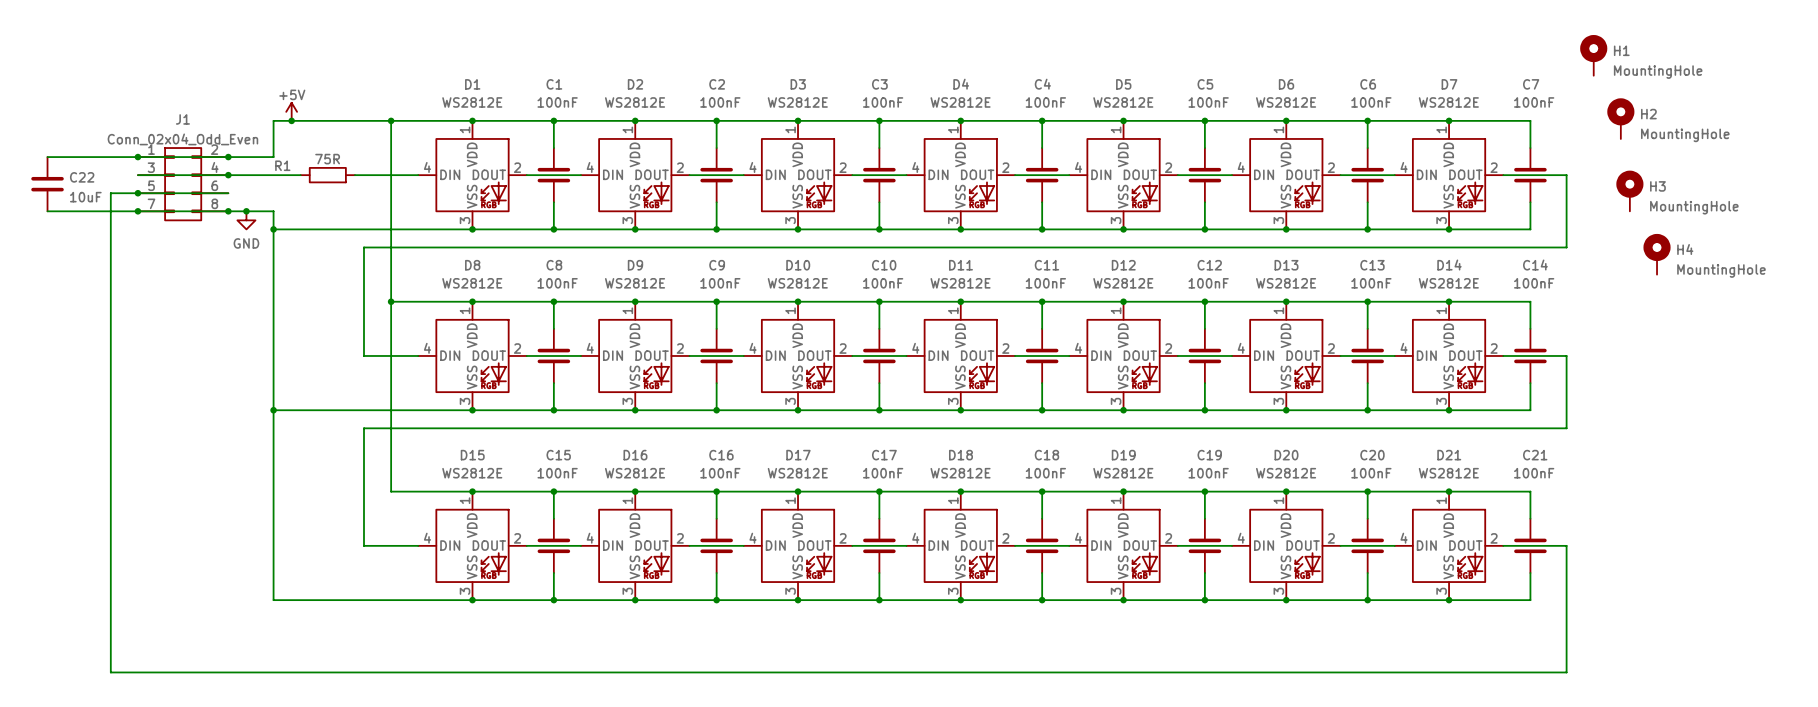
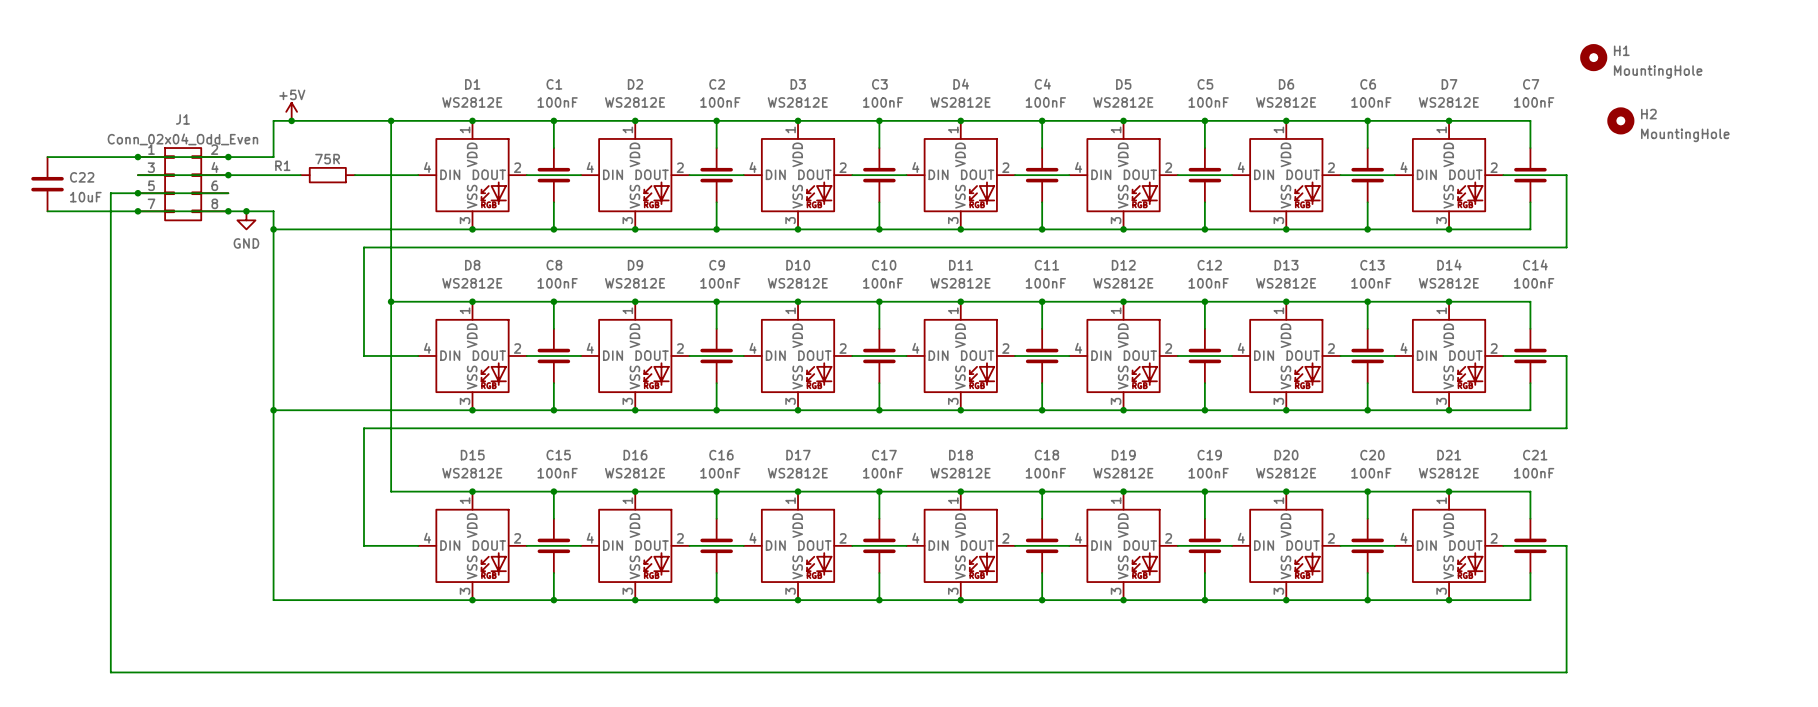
H1 symbol: [1580, 34, 1608, 76] -> [1580, 44, 1608, 72]
H2 symbol: [1607, 98, 1635, 139] -> [1607, 107, 1635, 135]
H3: MountingHole (1629, 190) -> none
H4: MountingHole (1657, 254) -> none

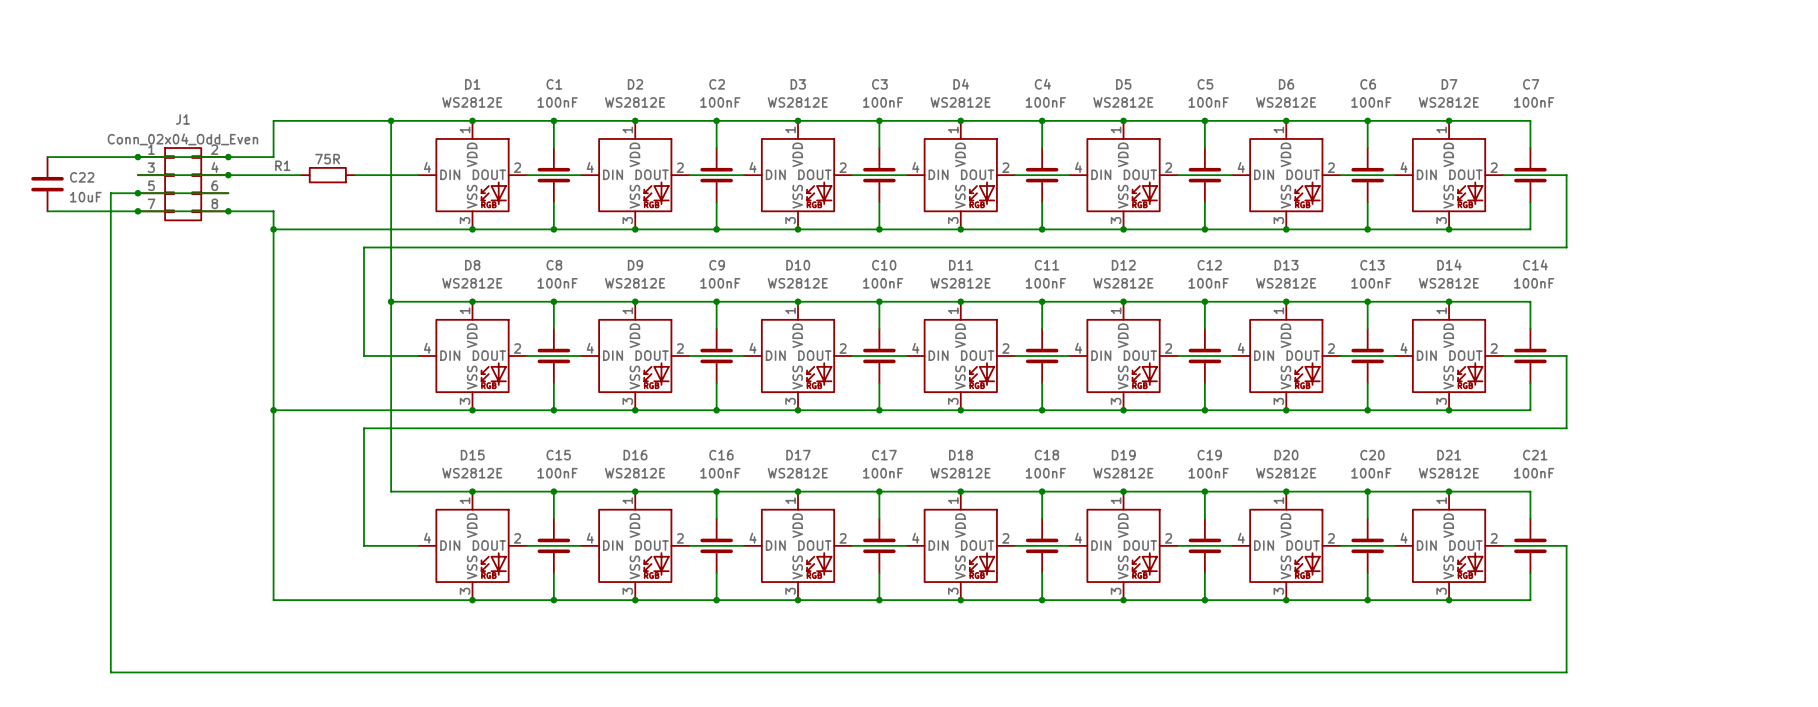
H1: MountingHole (1593, 57) -> none
power symbol: +5V (291, 111) -> none
junction: (291, 120) -> none
H2: MountingHole (1620, 120) -> none
junction: (246, 211) -> none
power symbol: GND (246, 220) -> none

